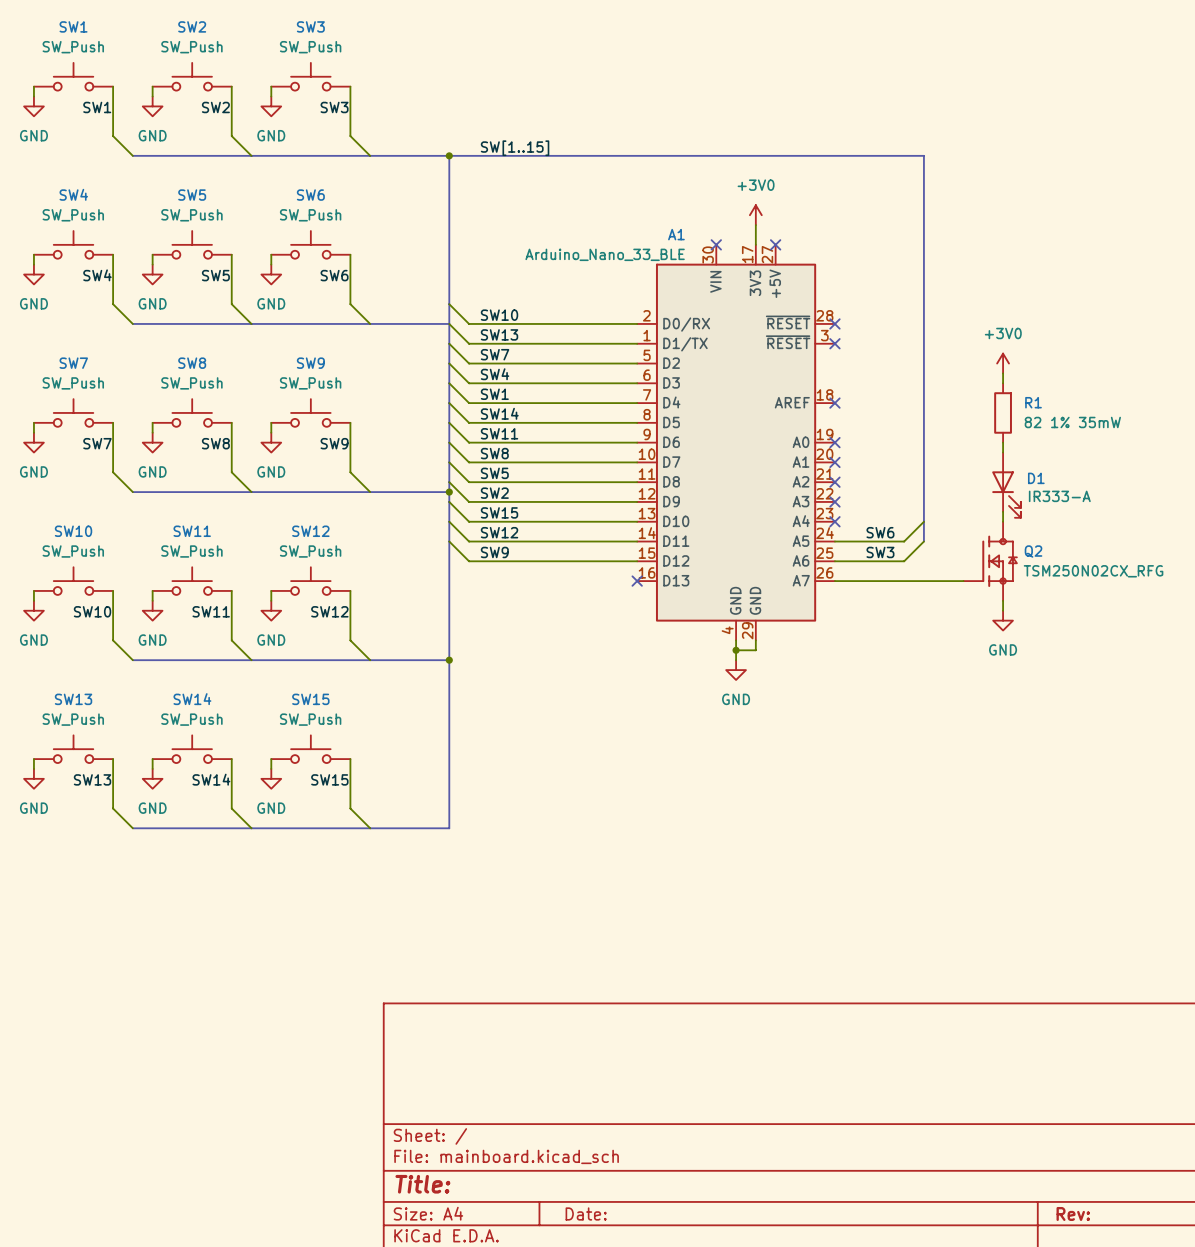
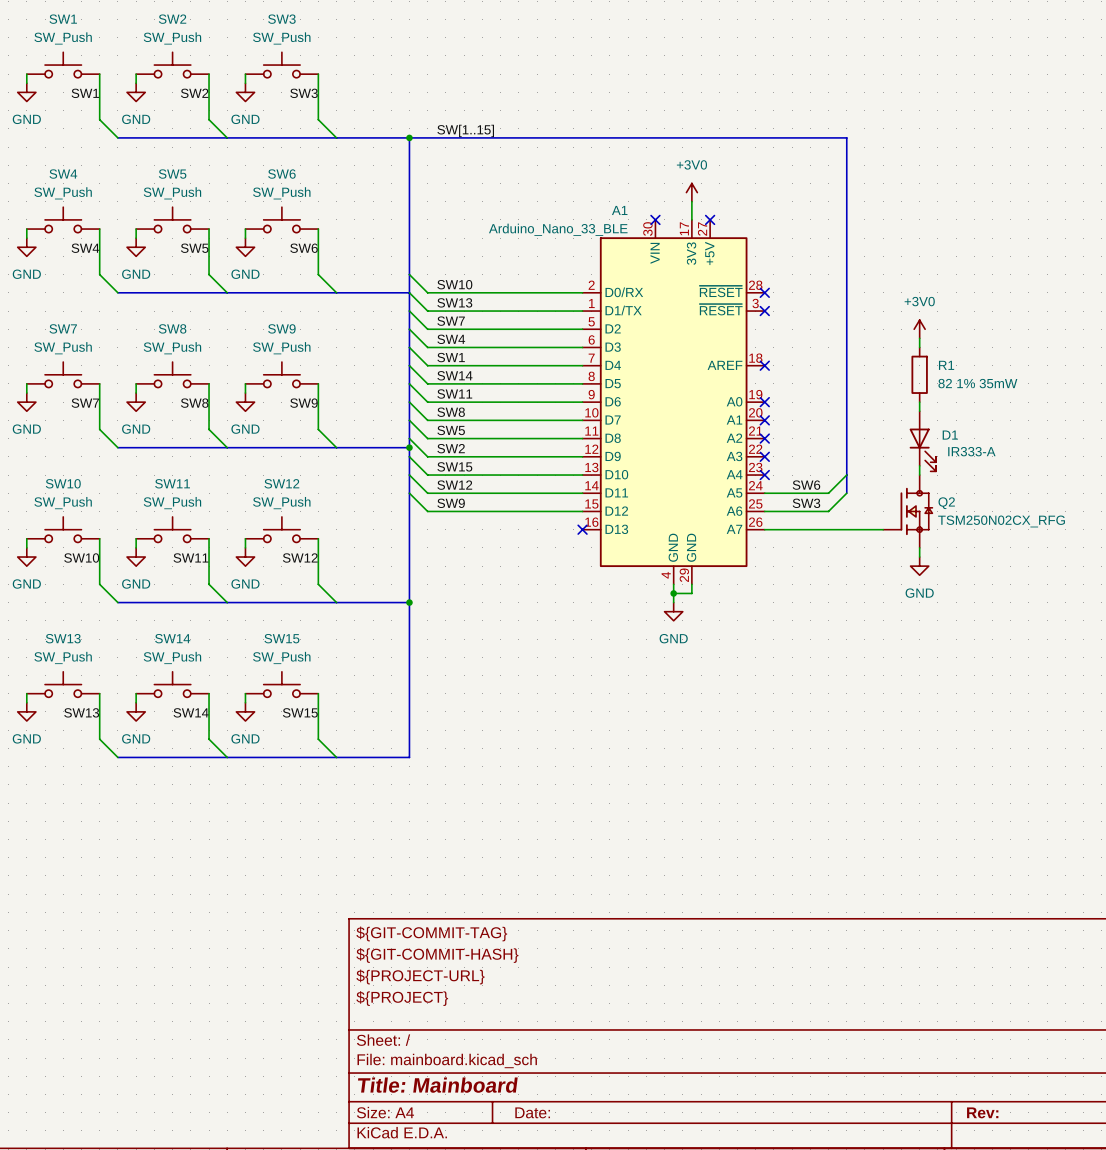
title block: none -> ${GIT-COMMIT-TAG} (431, 933)
title block: none -> ${GIT-COMMIT-HASH} (437, 955)
title block: none -> ${PROJECT-URL} (420, 976)
title block: none -> ${PROJECT} (402, 998)
title block: Title: (422, 1184) -> Title: Mainboard (437, 1085)

